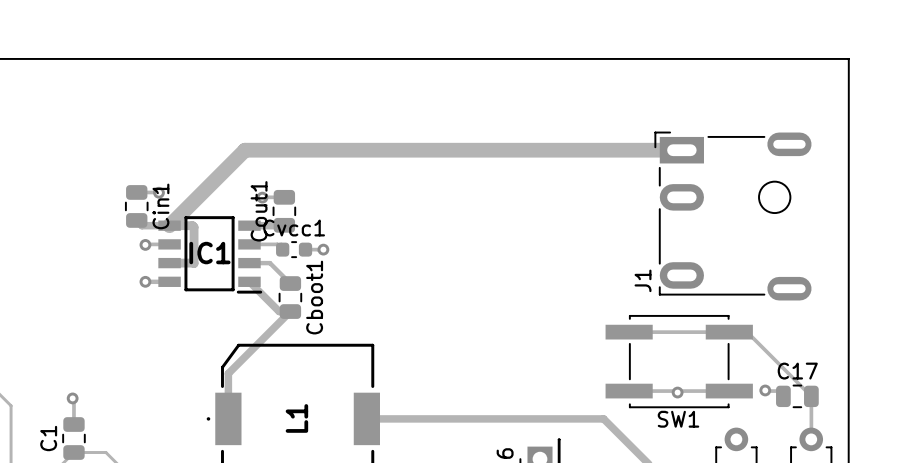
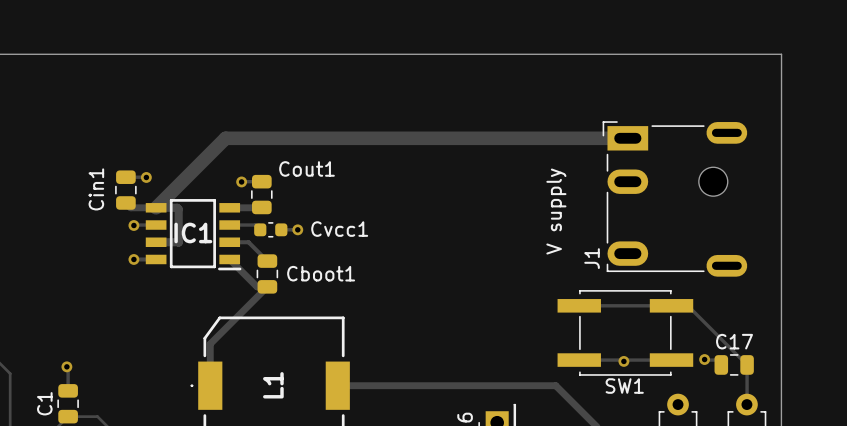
Cin1 name position: Cin1 (160, 206) -> Cin1 (96, 189)
Cout1 name rotation: 0° (259, 211) -> 90° clockwise (307, 168)
Cvcc1 name position: Cvcc1 (294, 228) -> Cvcc1 (339, 229)
text: none -> V supply (556, 211)
Cboot1 name rotation: 0° (314, 297) -> 90° clockwise (321, 273)

